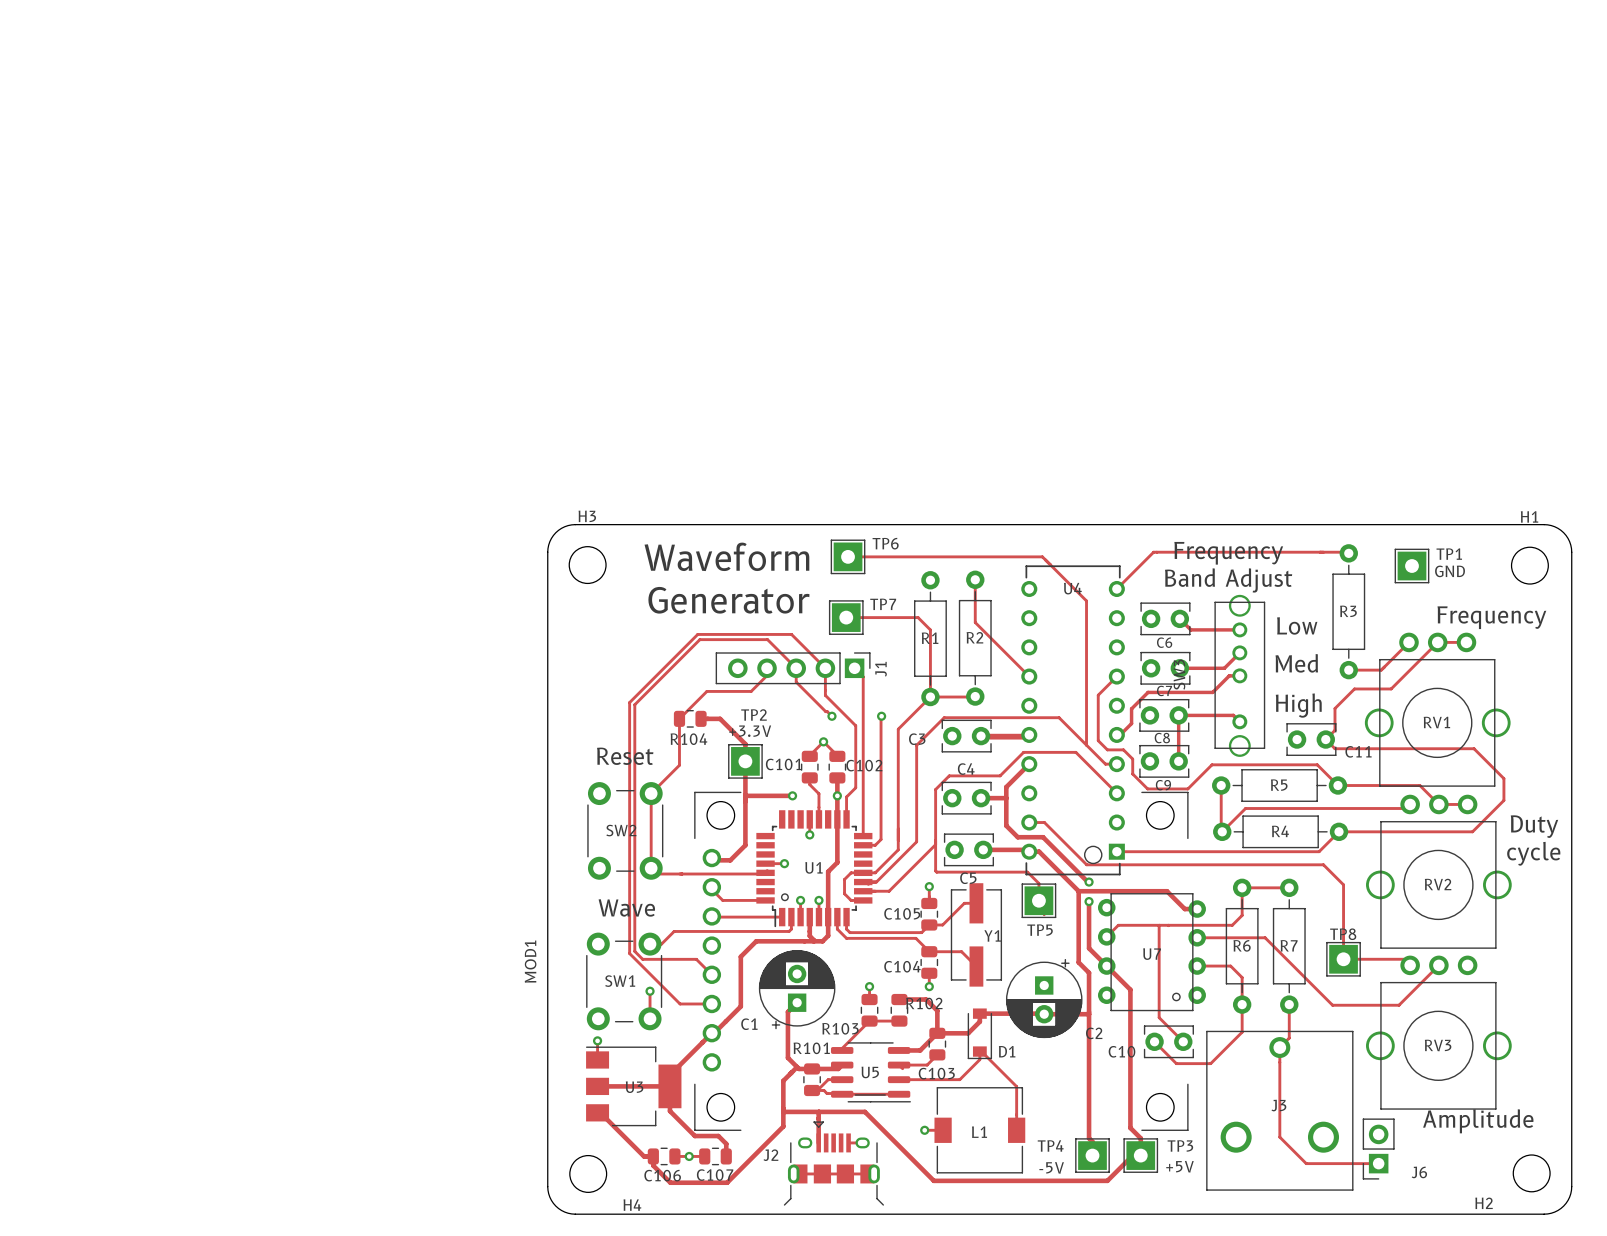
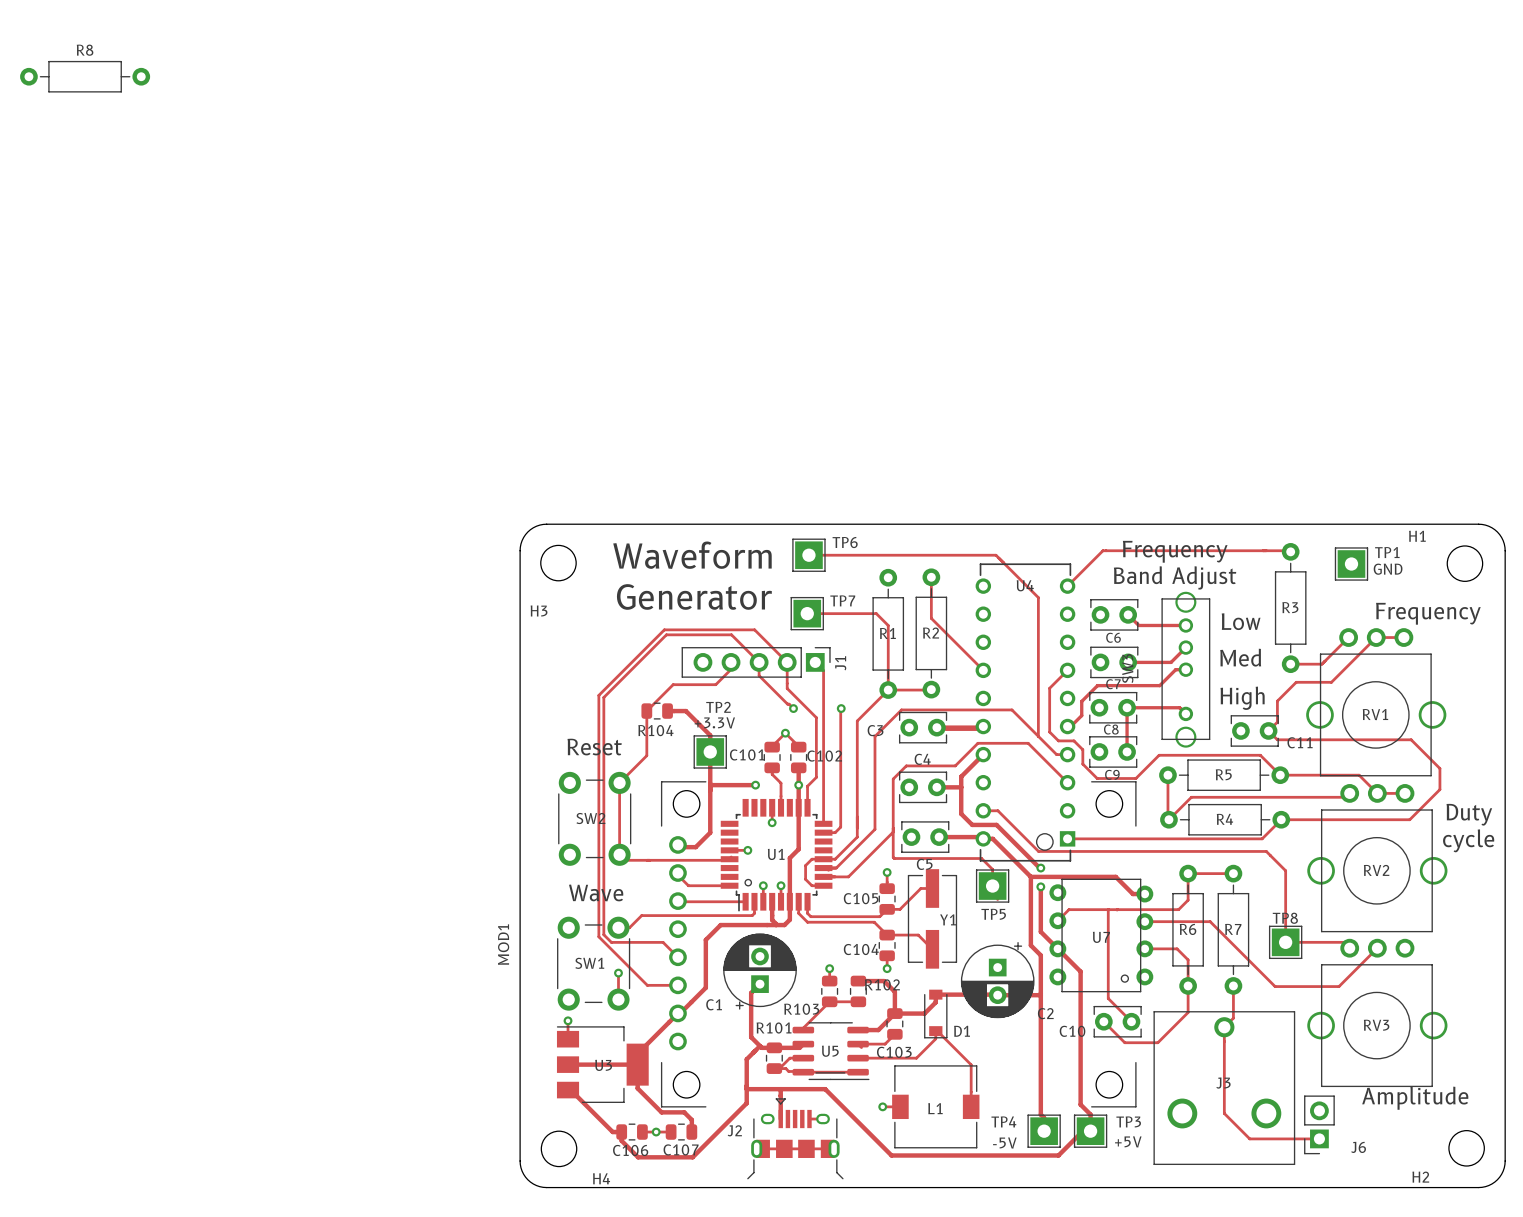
R8: none -> (85, 76)
H3 name position: H3 (587, 516) -> H3 (539, 610)
H1 name position: H1 (1529, 516) -> H1 (1417, 536)

